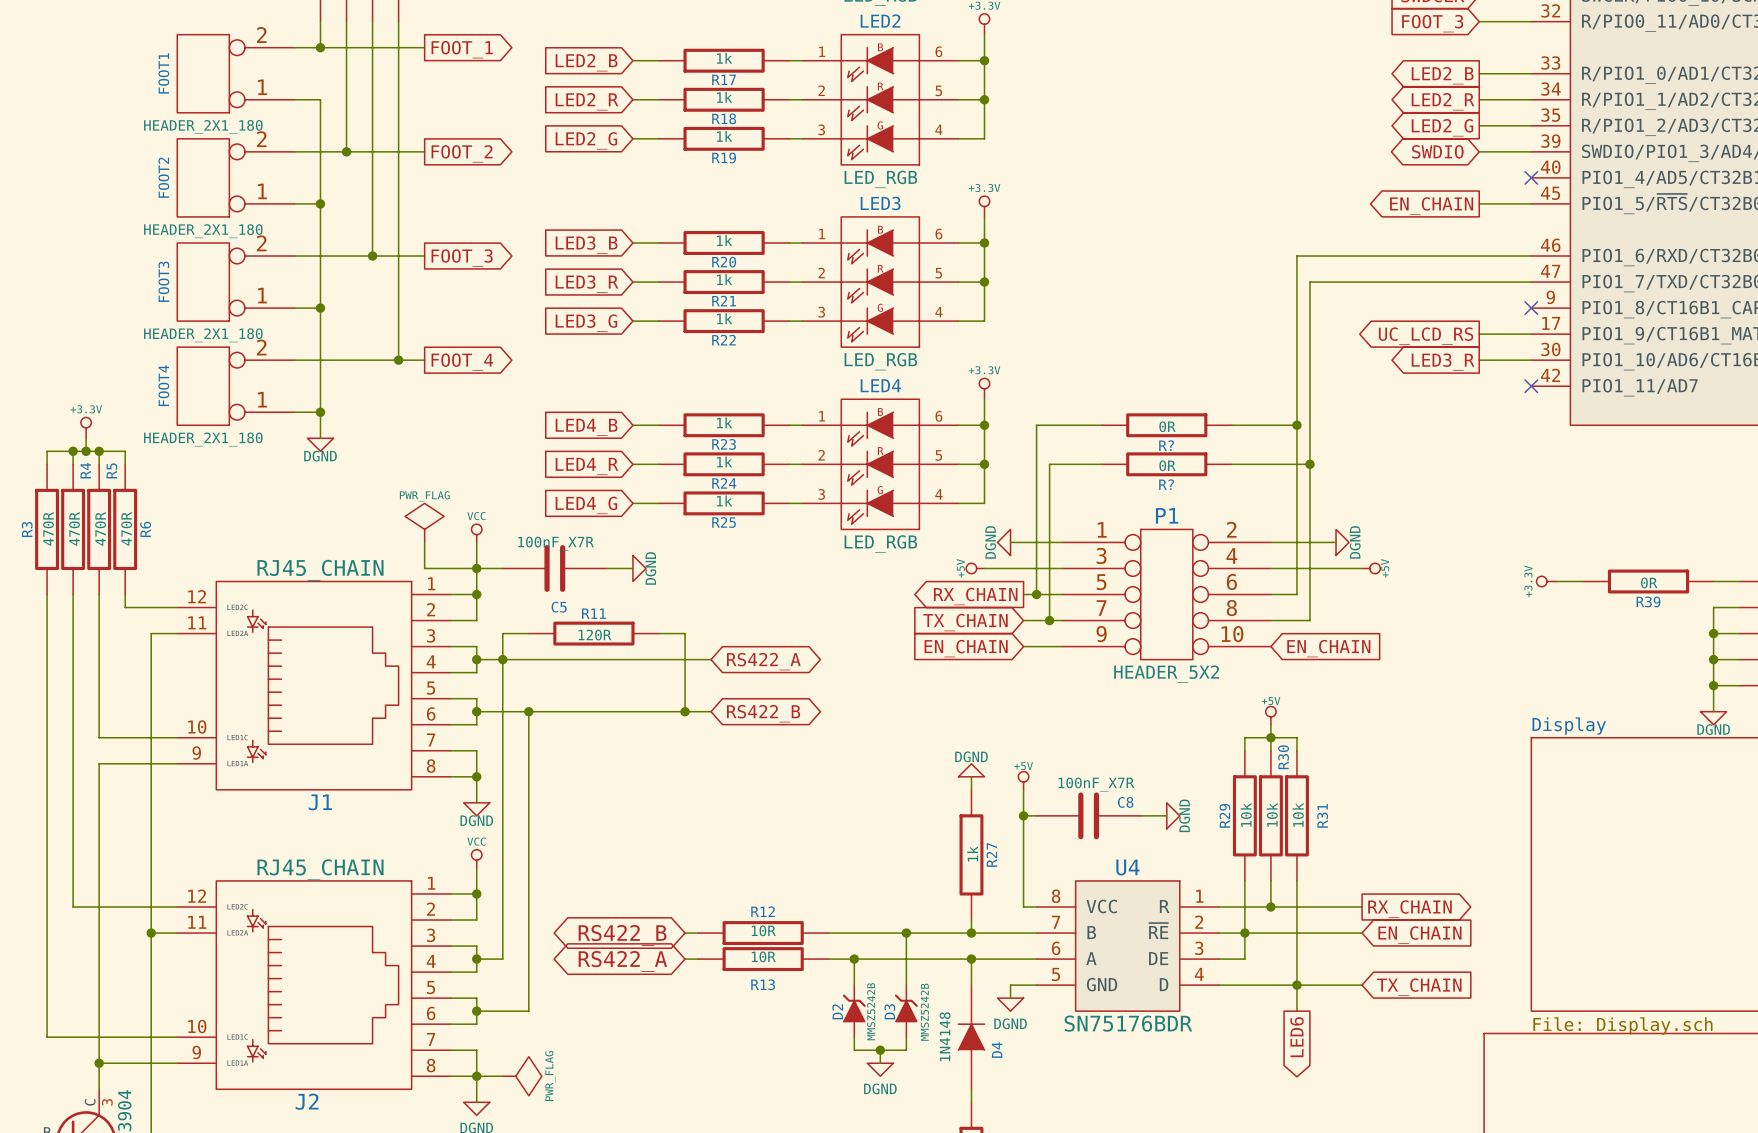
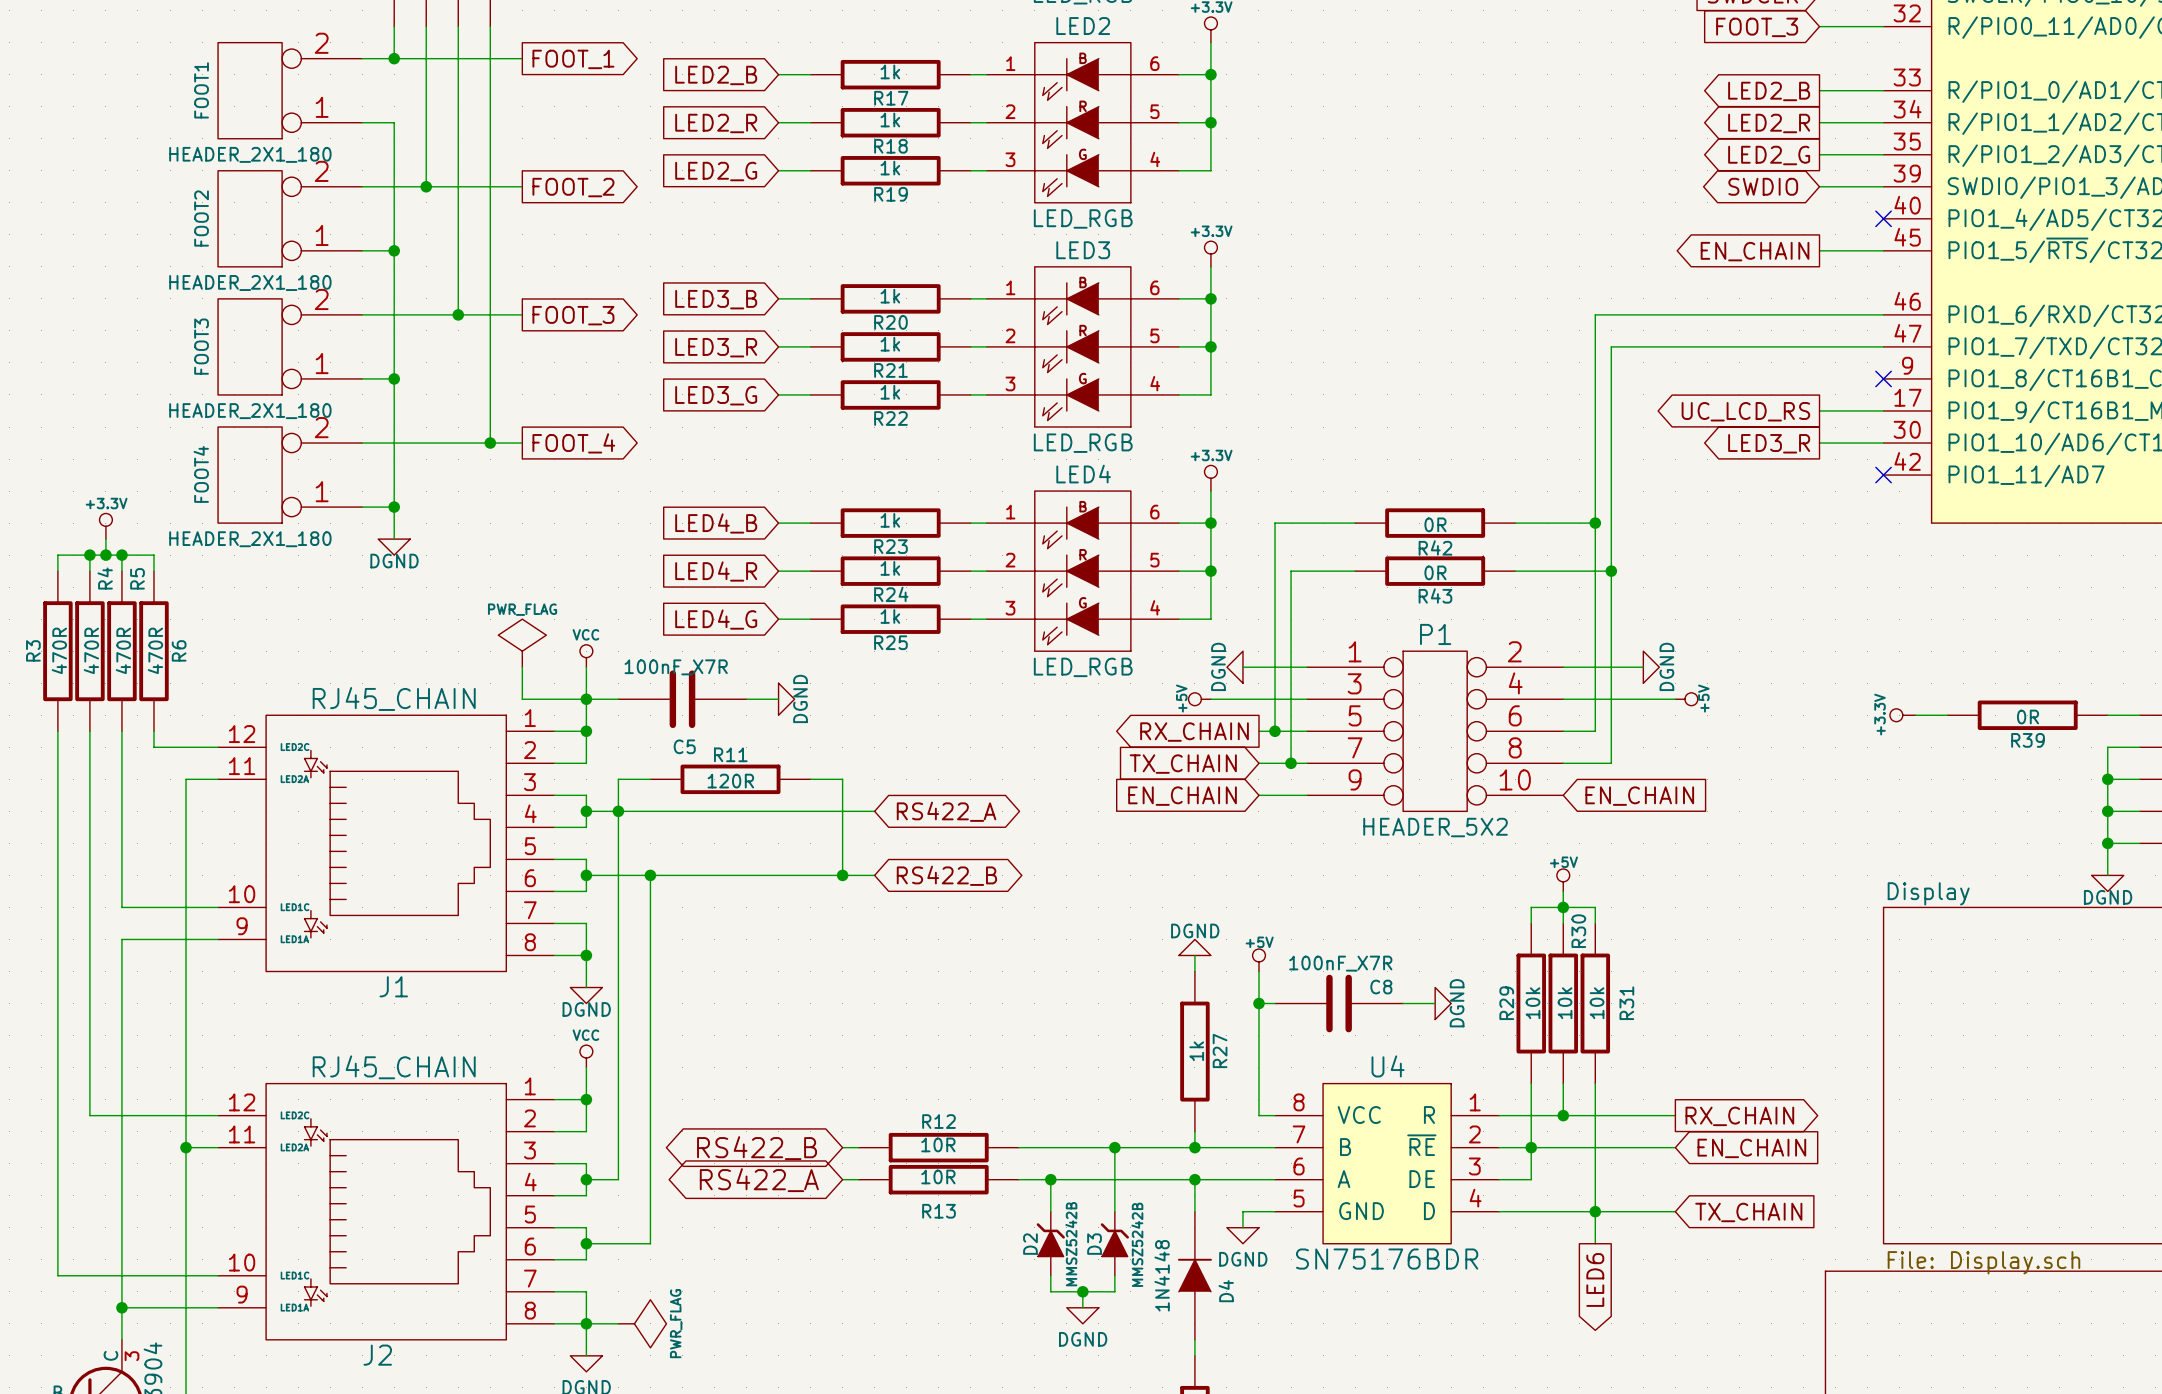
R? name: R? (1166, 445) -> R42 (1435, 547)
R? name: R? (1166, 484) -> R43 (1435, 595)

